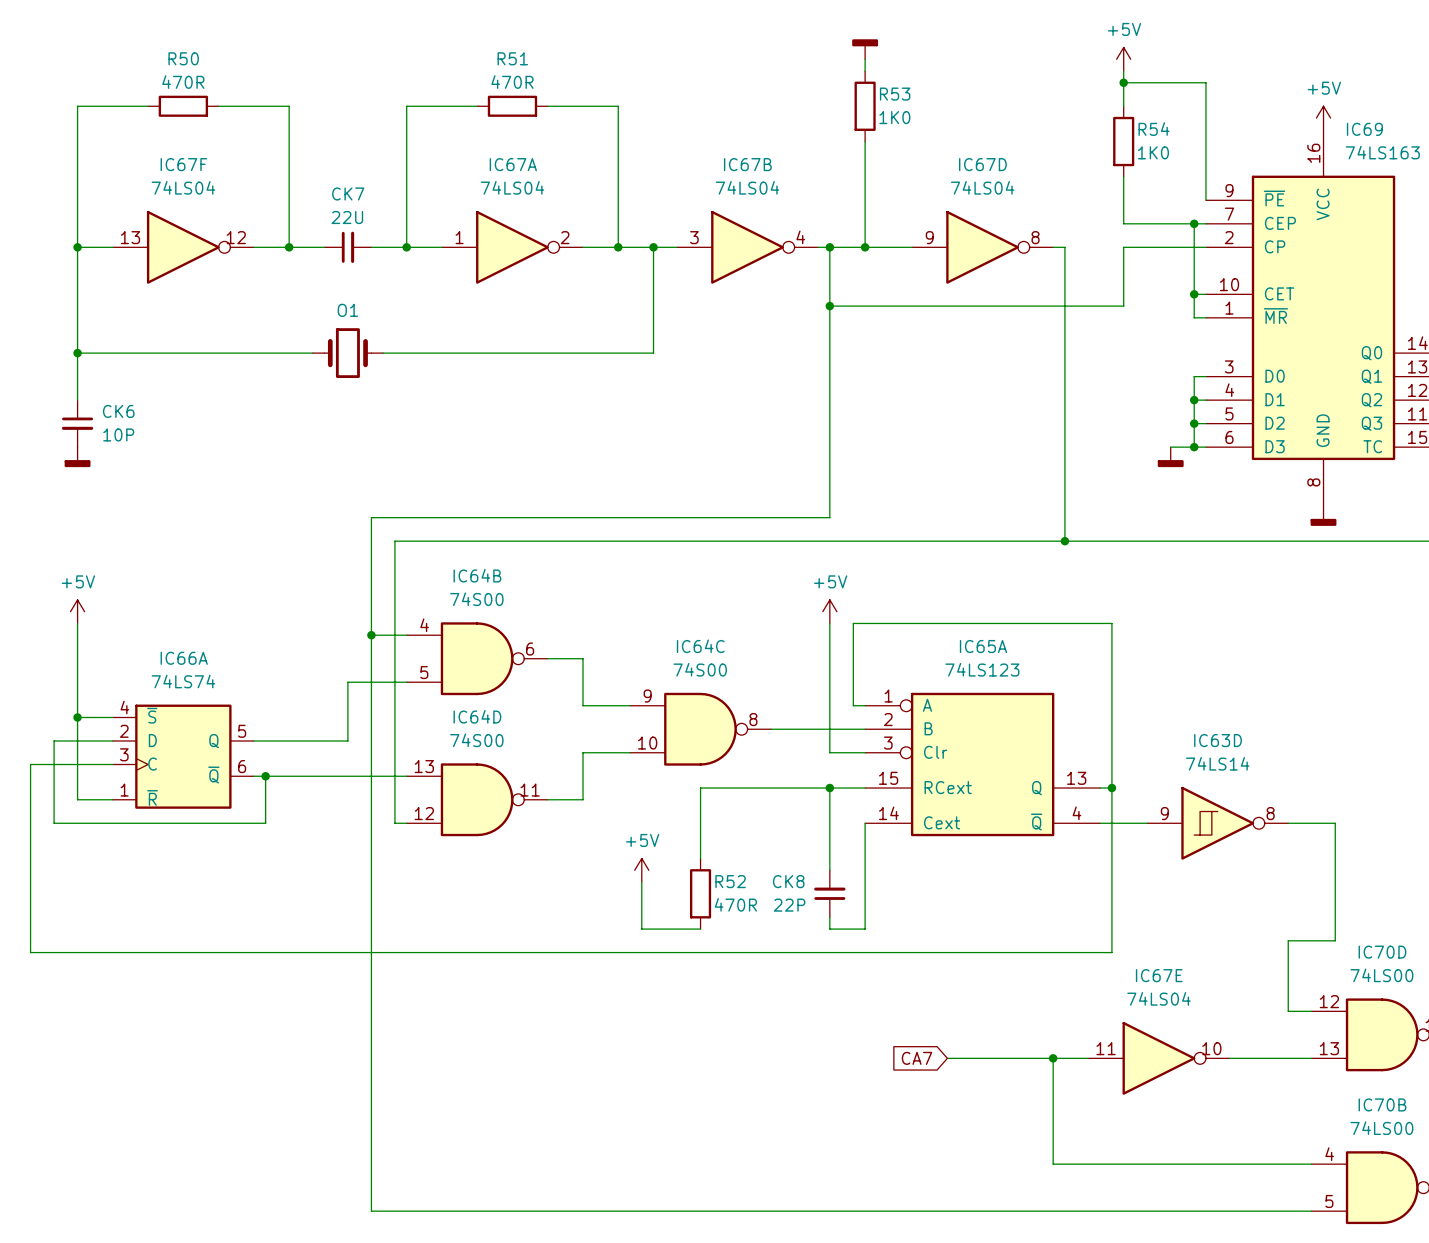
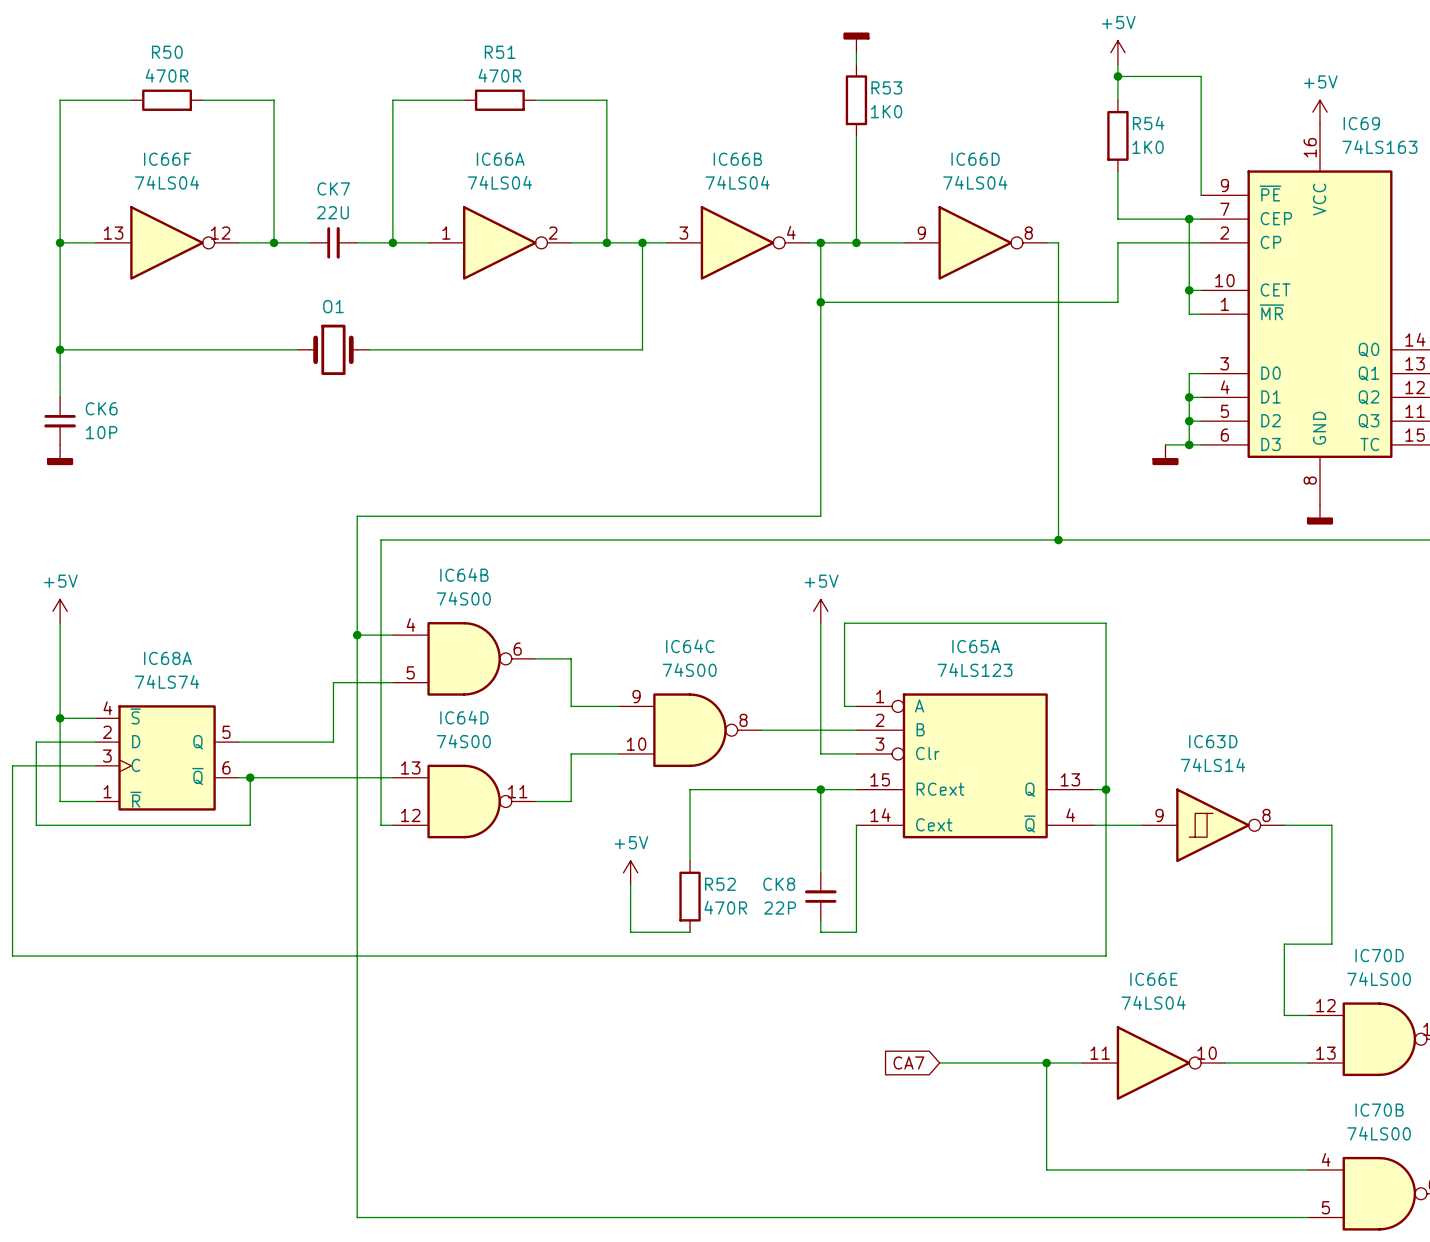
IC67F name: IC67F (183, 164) -> IC66F (167, 159)
IC67A name: IC67A (513, 164) -> IC66A (500, 159)
IC67B name: IC67B (747, 164) -> IC66B (737, 159)
IC67D name: IC67D (982, 164) -> IC66D (975, 159)
IC66A name: IC66A (184, 658) -> IC68A (167, 658)
IC67E name: IC67E (1159, 975) -> IC66E (1153, 979)

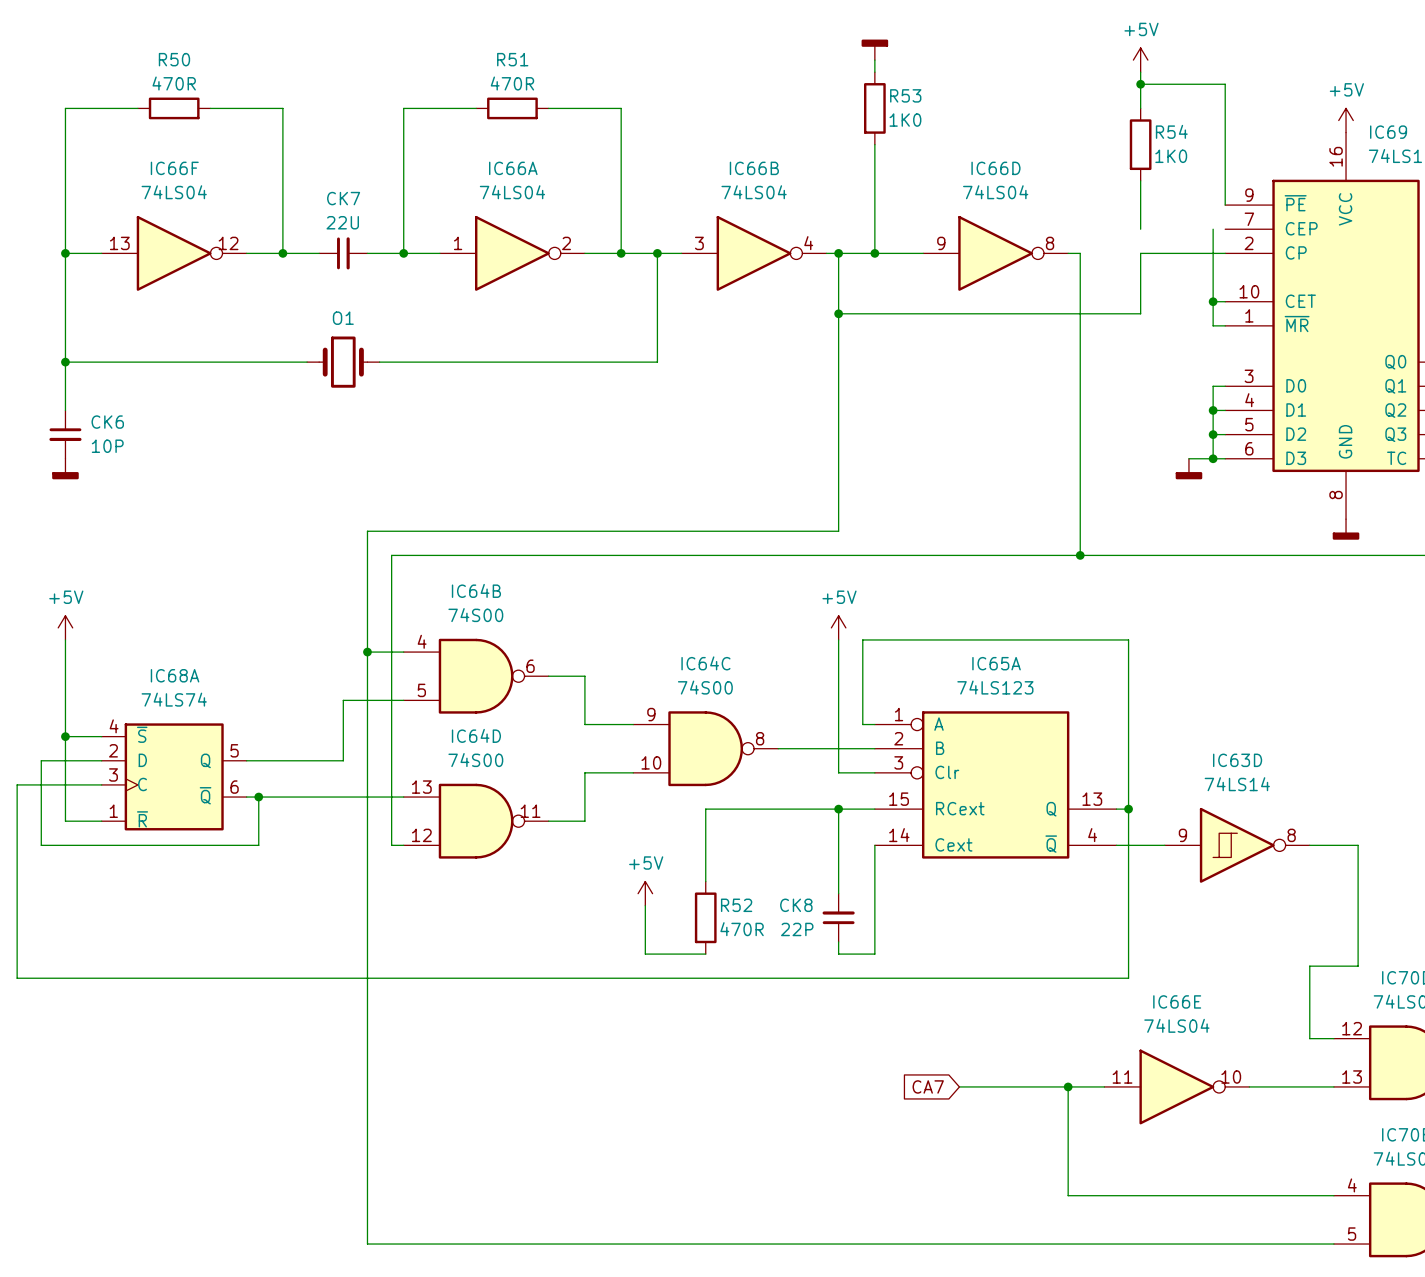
wire: (1117, 219) (1201, 219) -> none
junction: (1189, 219) -> none

